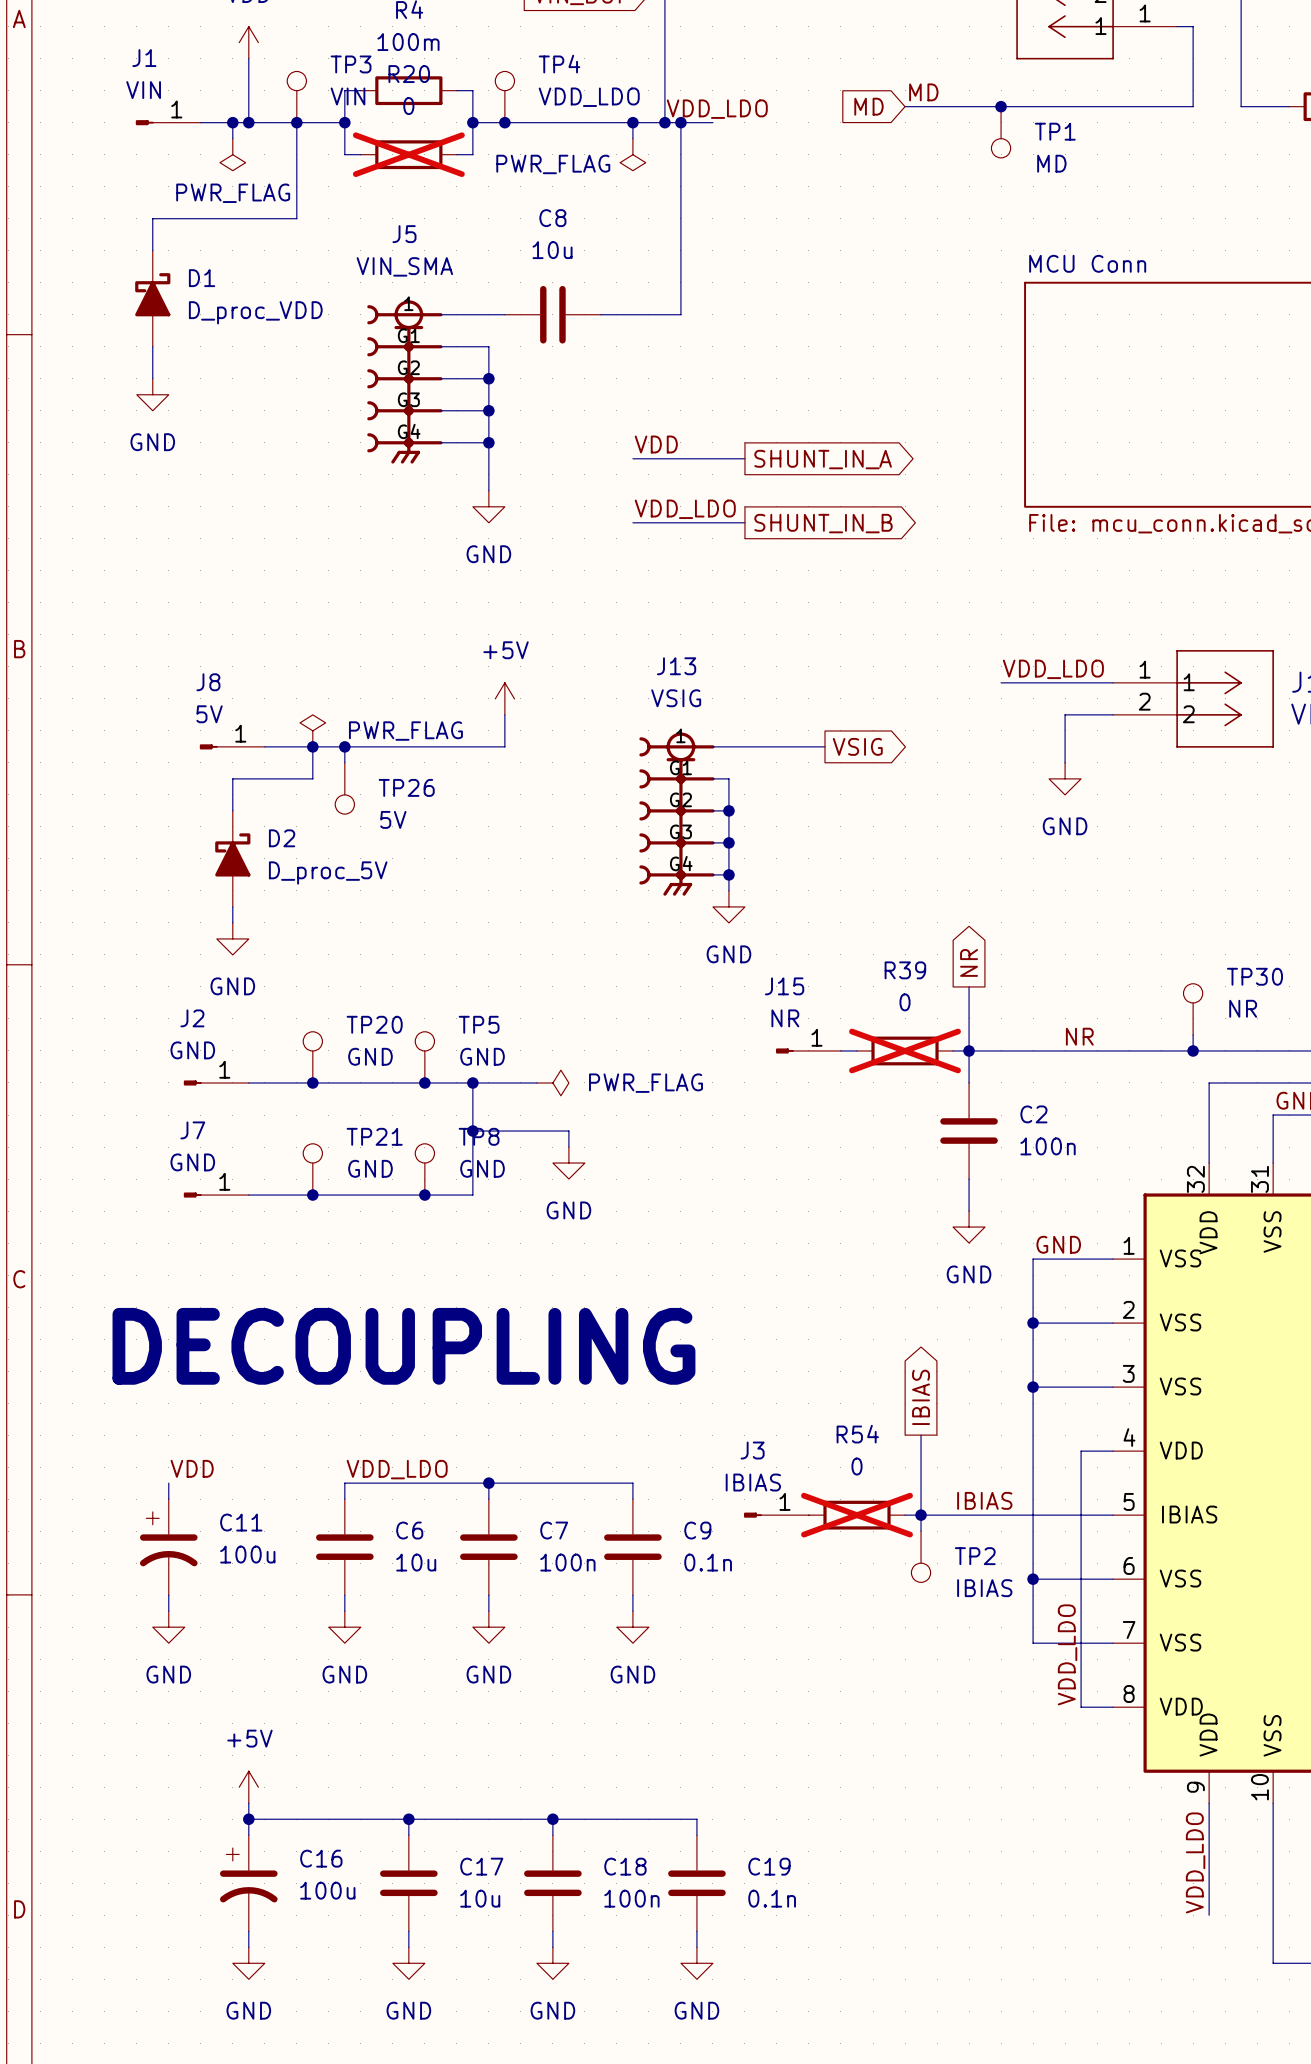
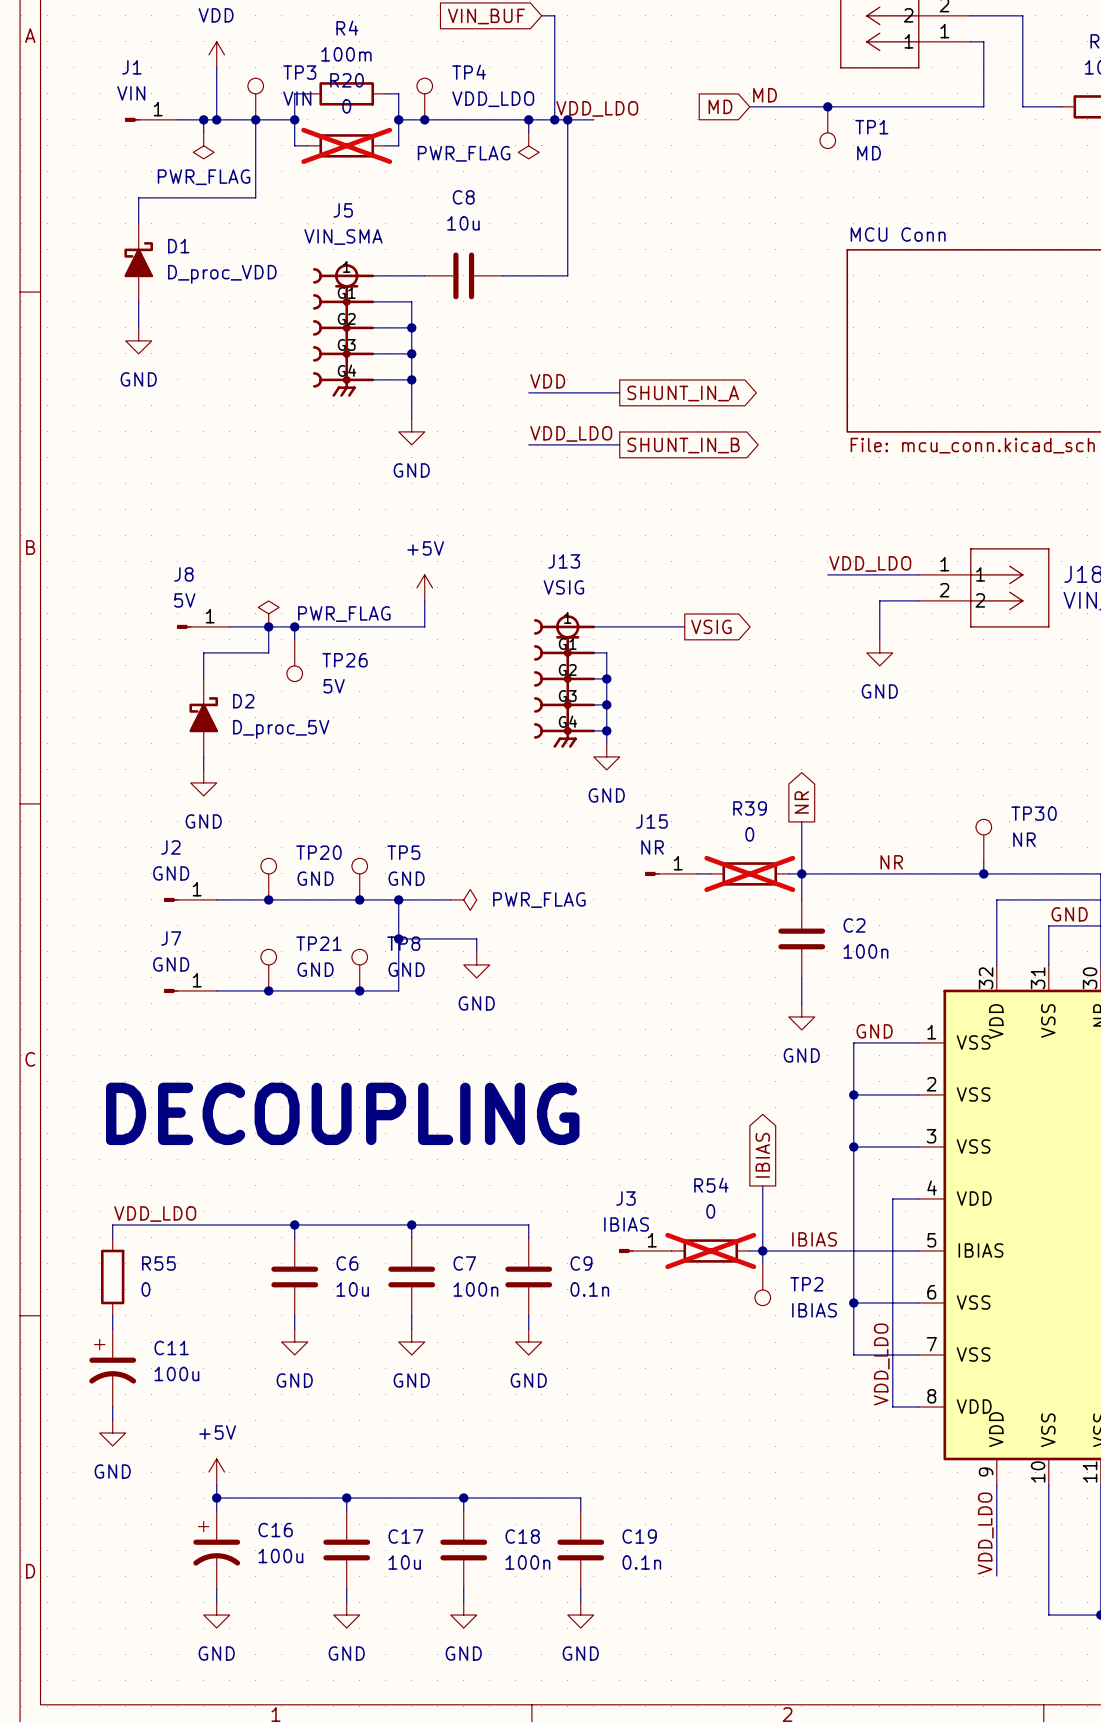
label: VDD (192, 1468) -> none
label position: VDD_LDO (397, 1469) -> VDD_LDO (155, 1214)
wire: (168, 1483) (168, 1499) -> (112, 1407) (112, 1420)
wire: none -> (294, 1224) (112, 1224) (112, 1237)
junction: none -> (294, 1224)
R55: none -> 0 (112, 1276)
C11 position: (168, 1547) -> (112, 1368)
wire: (168, 1595) (168, 1611) -> (112, 1315) (112, 1329)
power symbol position: GND (168, 1627) -> GND (112, 1433)

